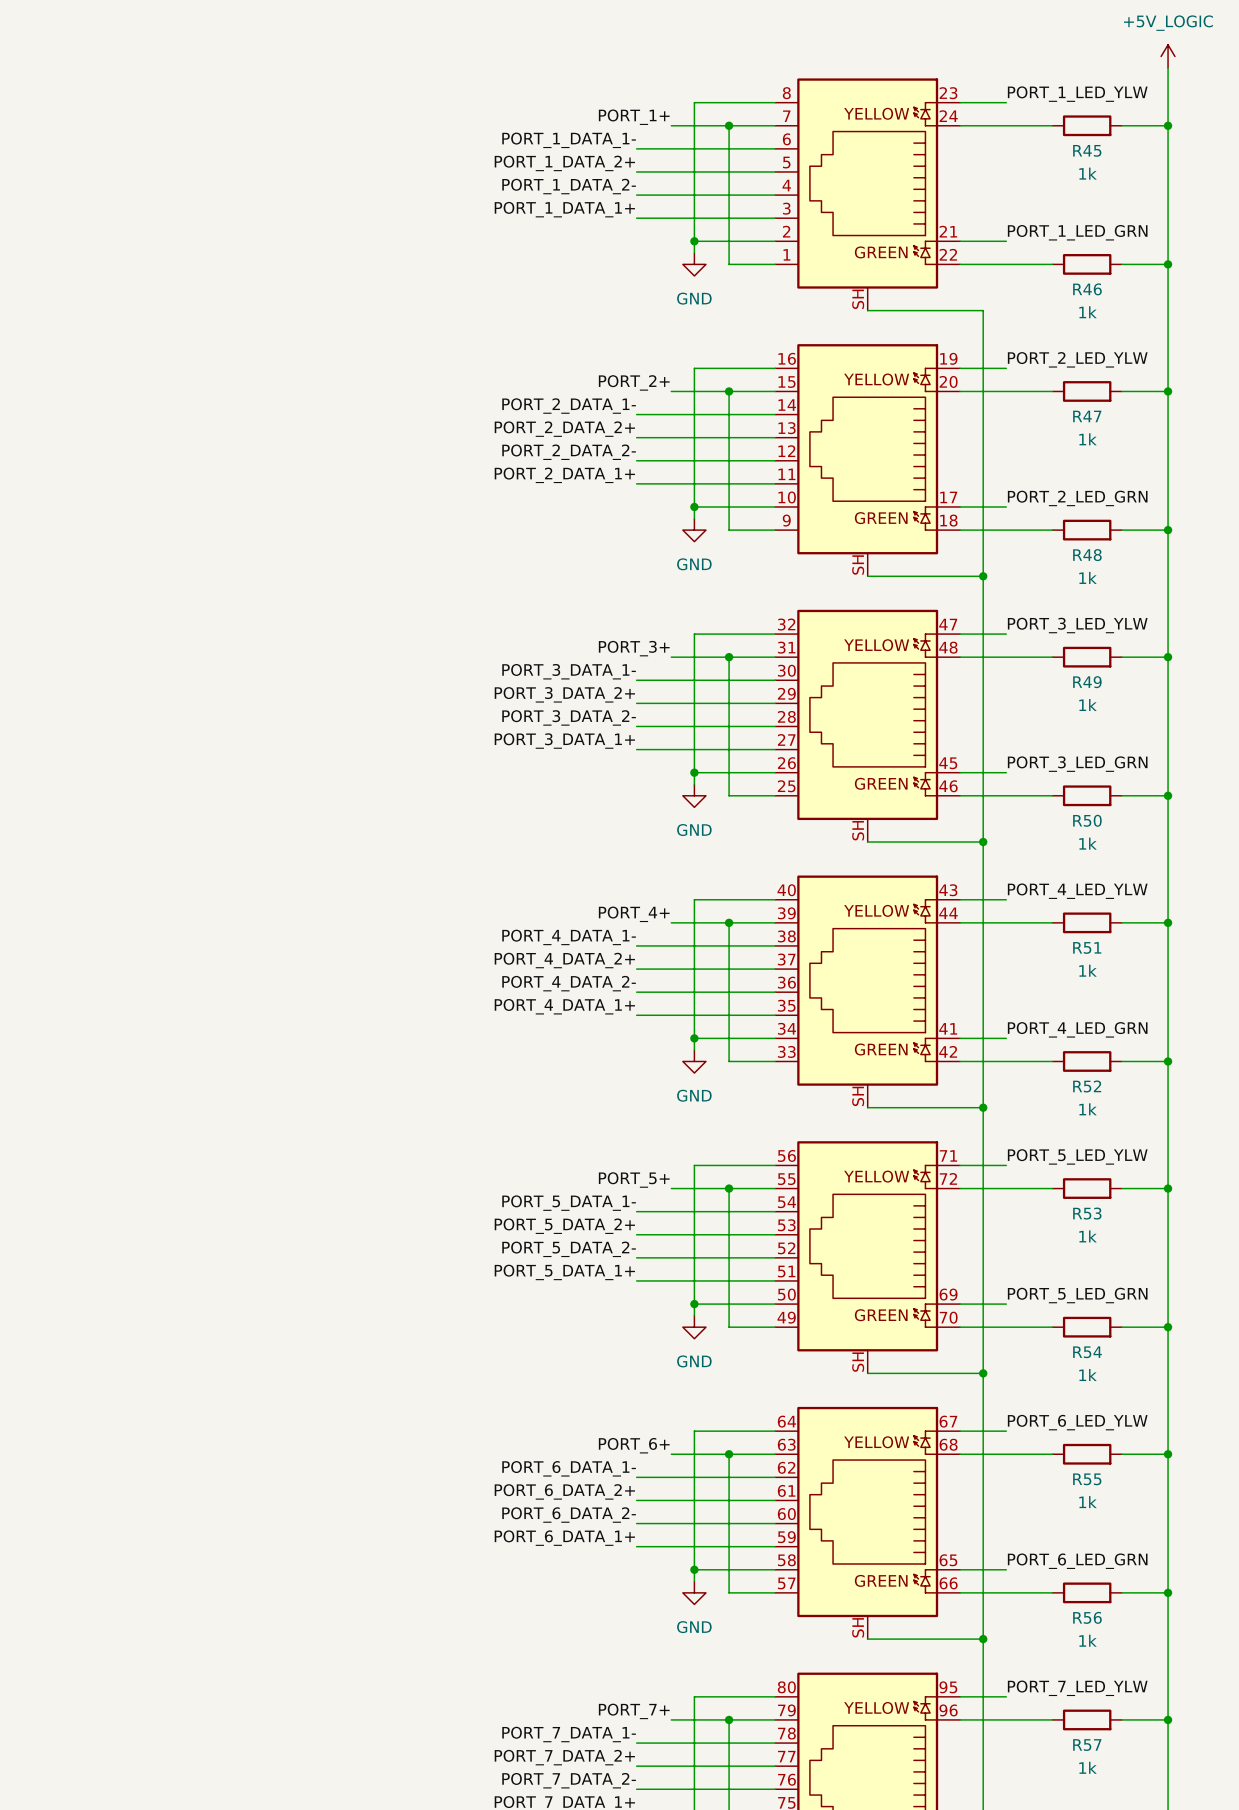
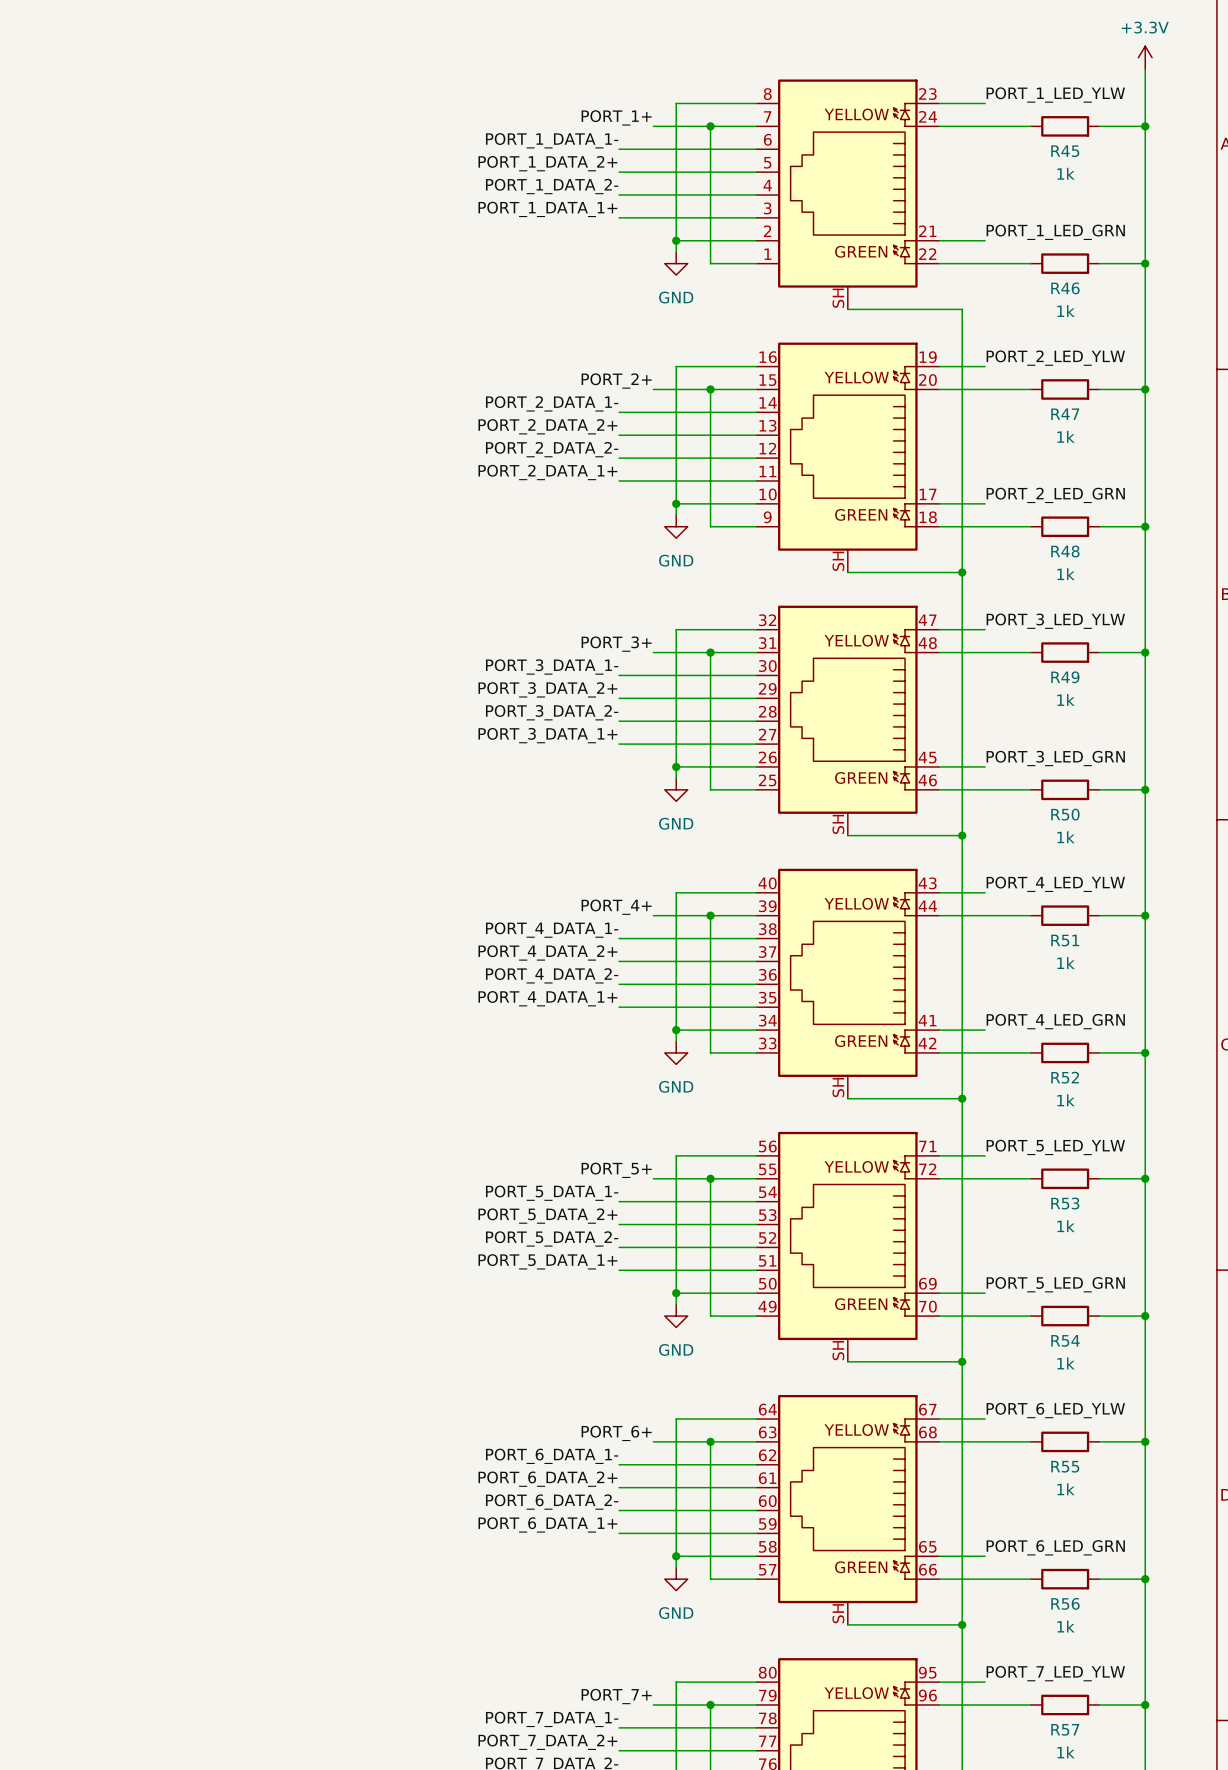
power symbol: +5V_LOGIC (1168, 56) -> +3.3V (1145, 57)

